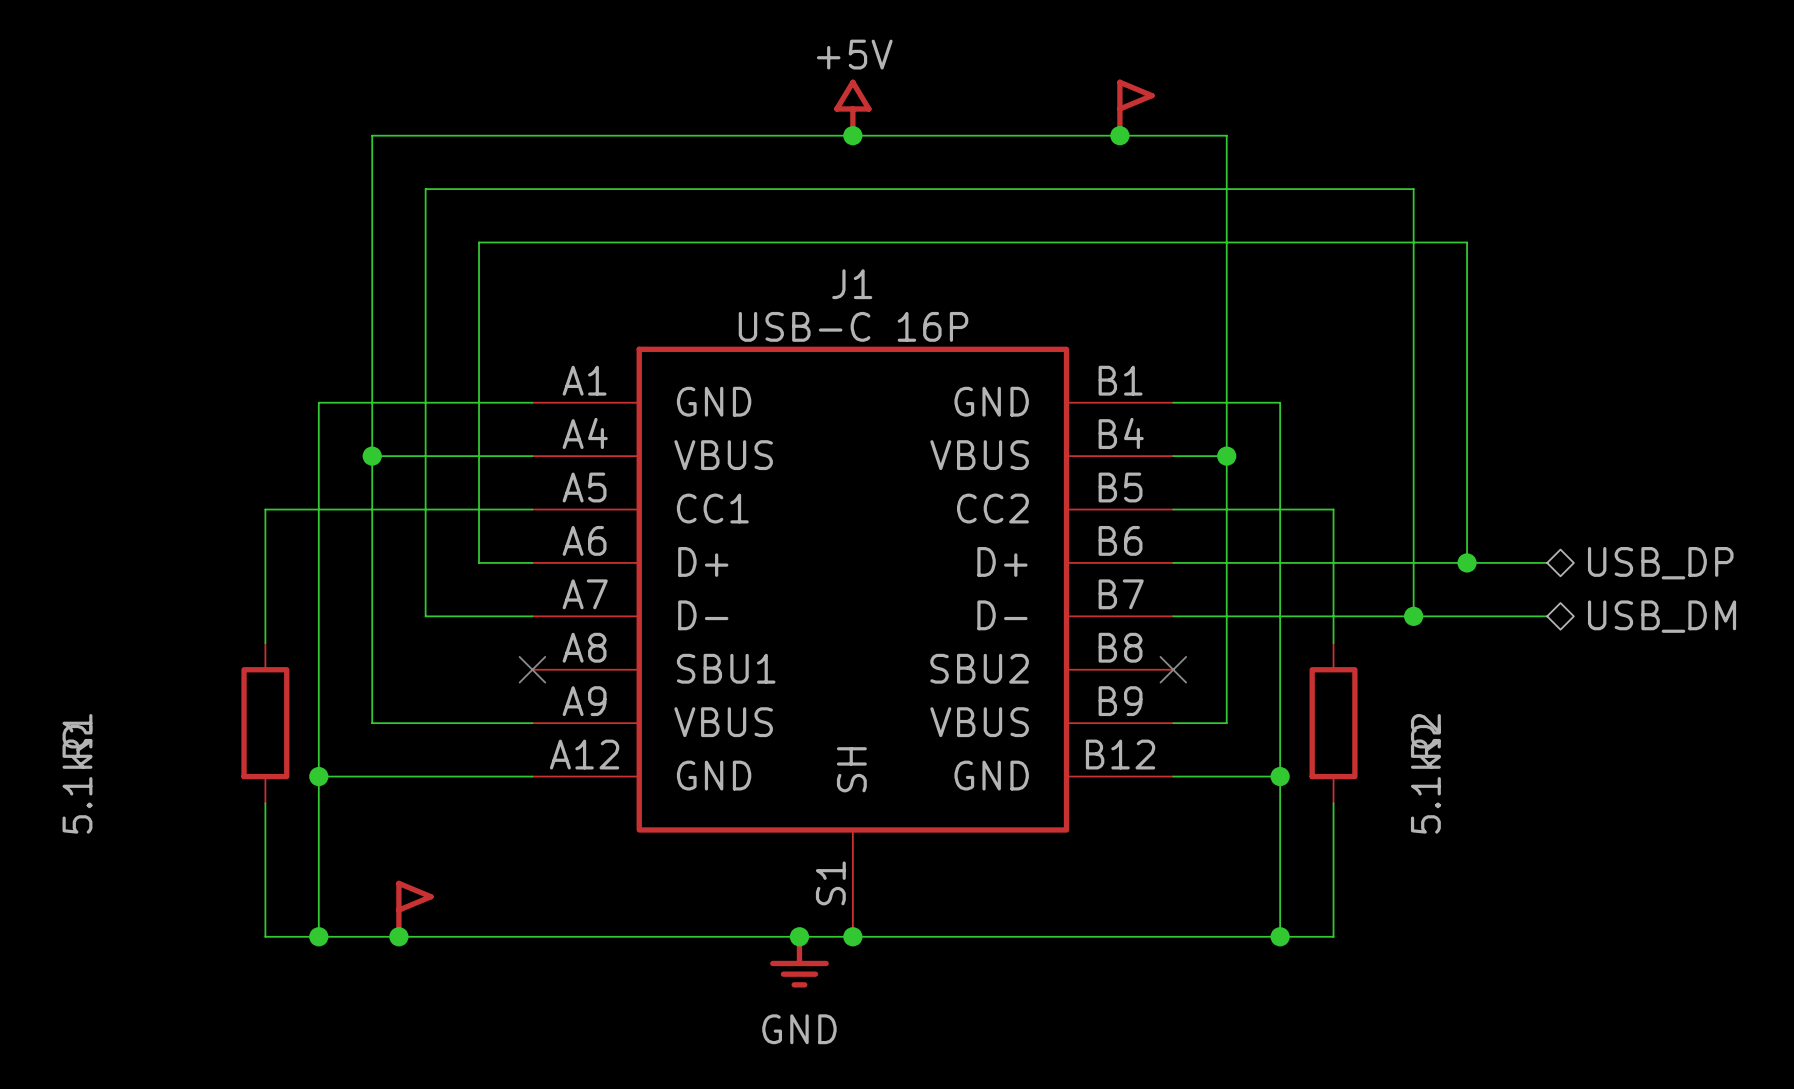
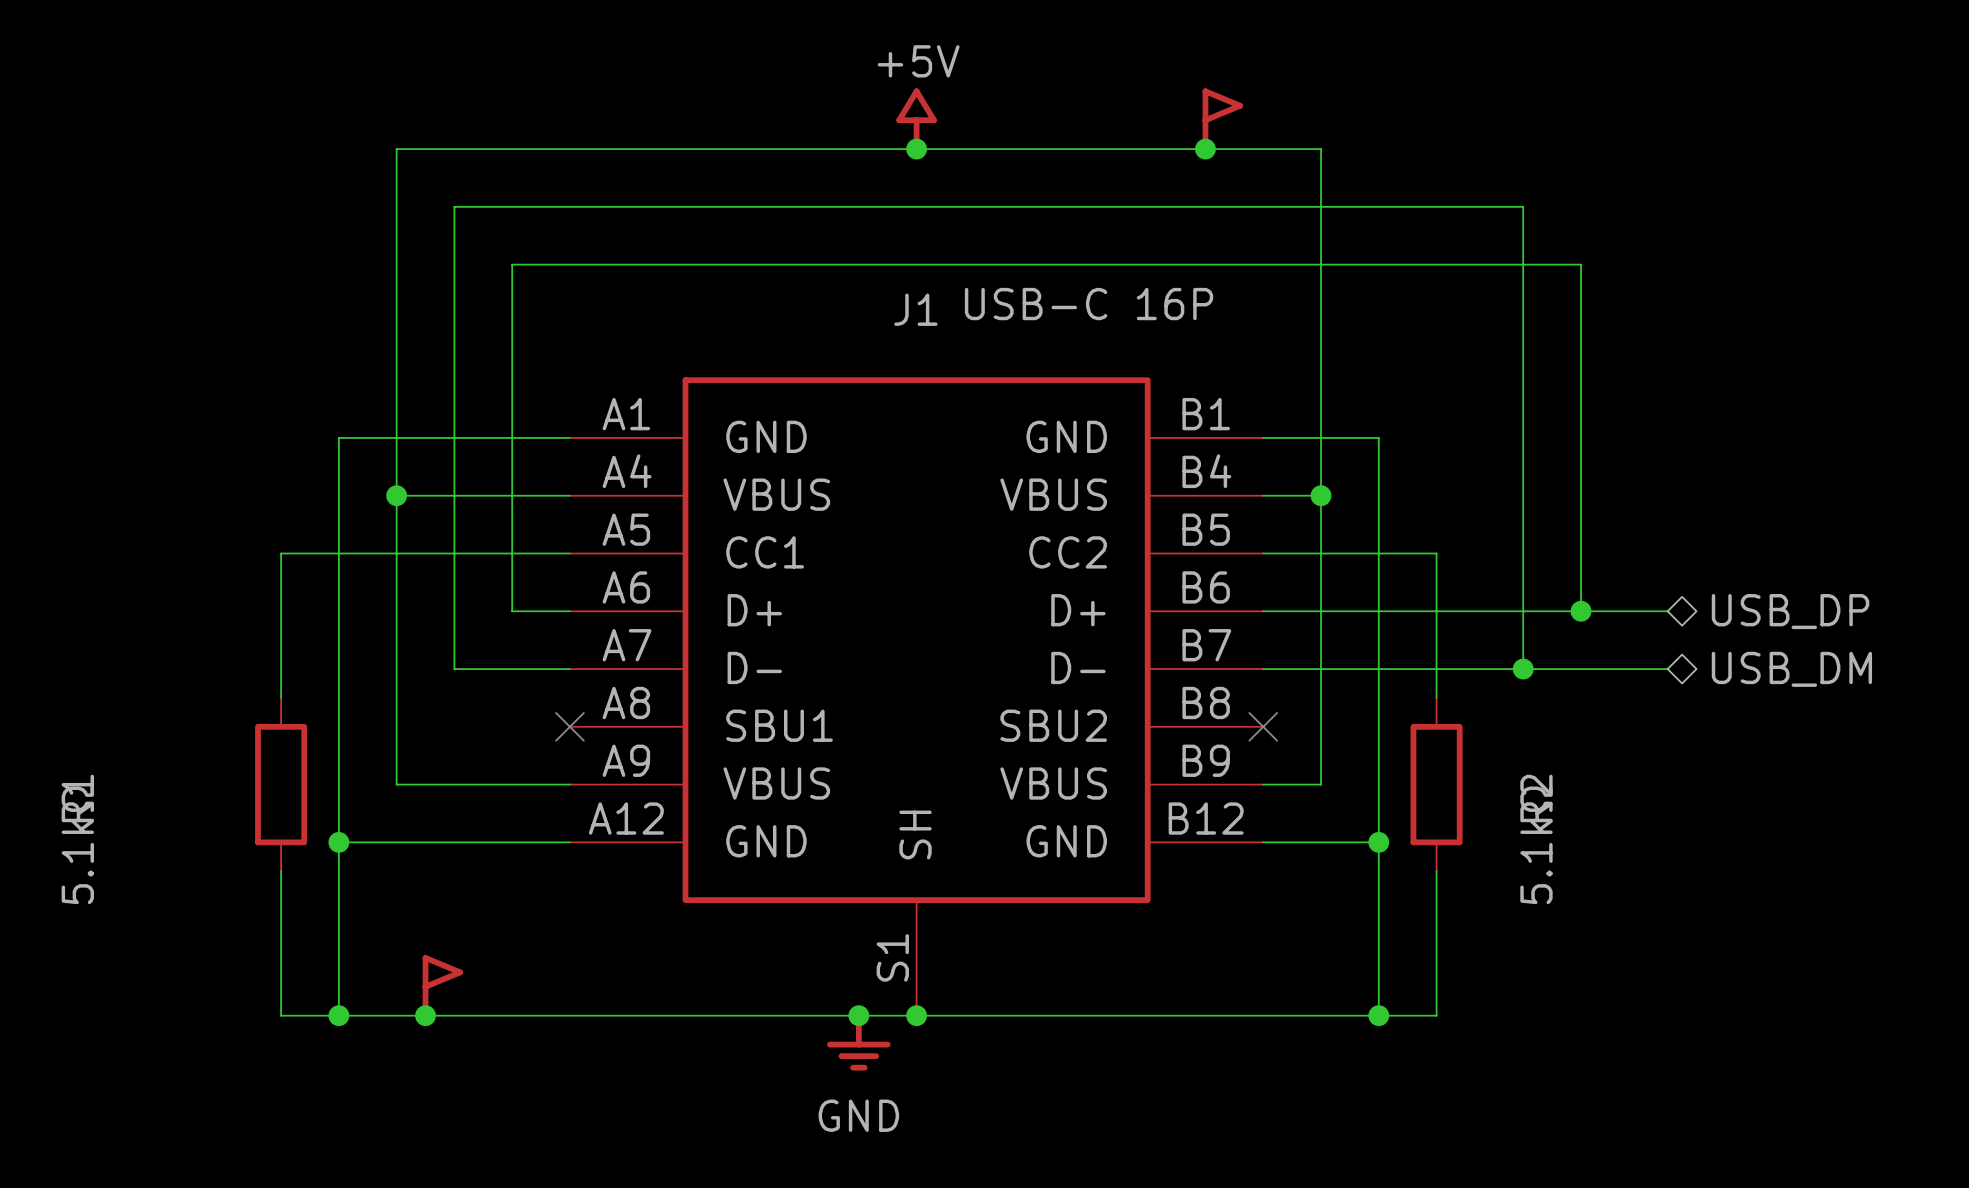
J1 value position: USB-C 16P (853, 326) -> USB-C 16P (1089, 304)

